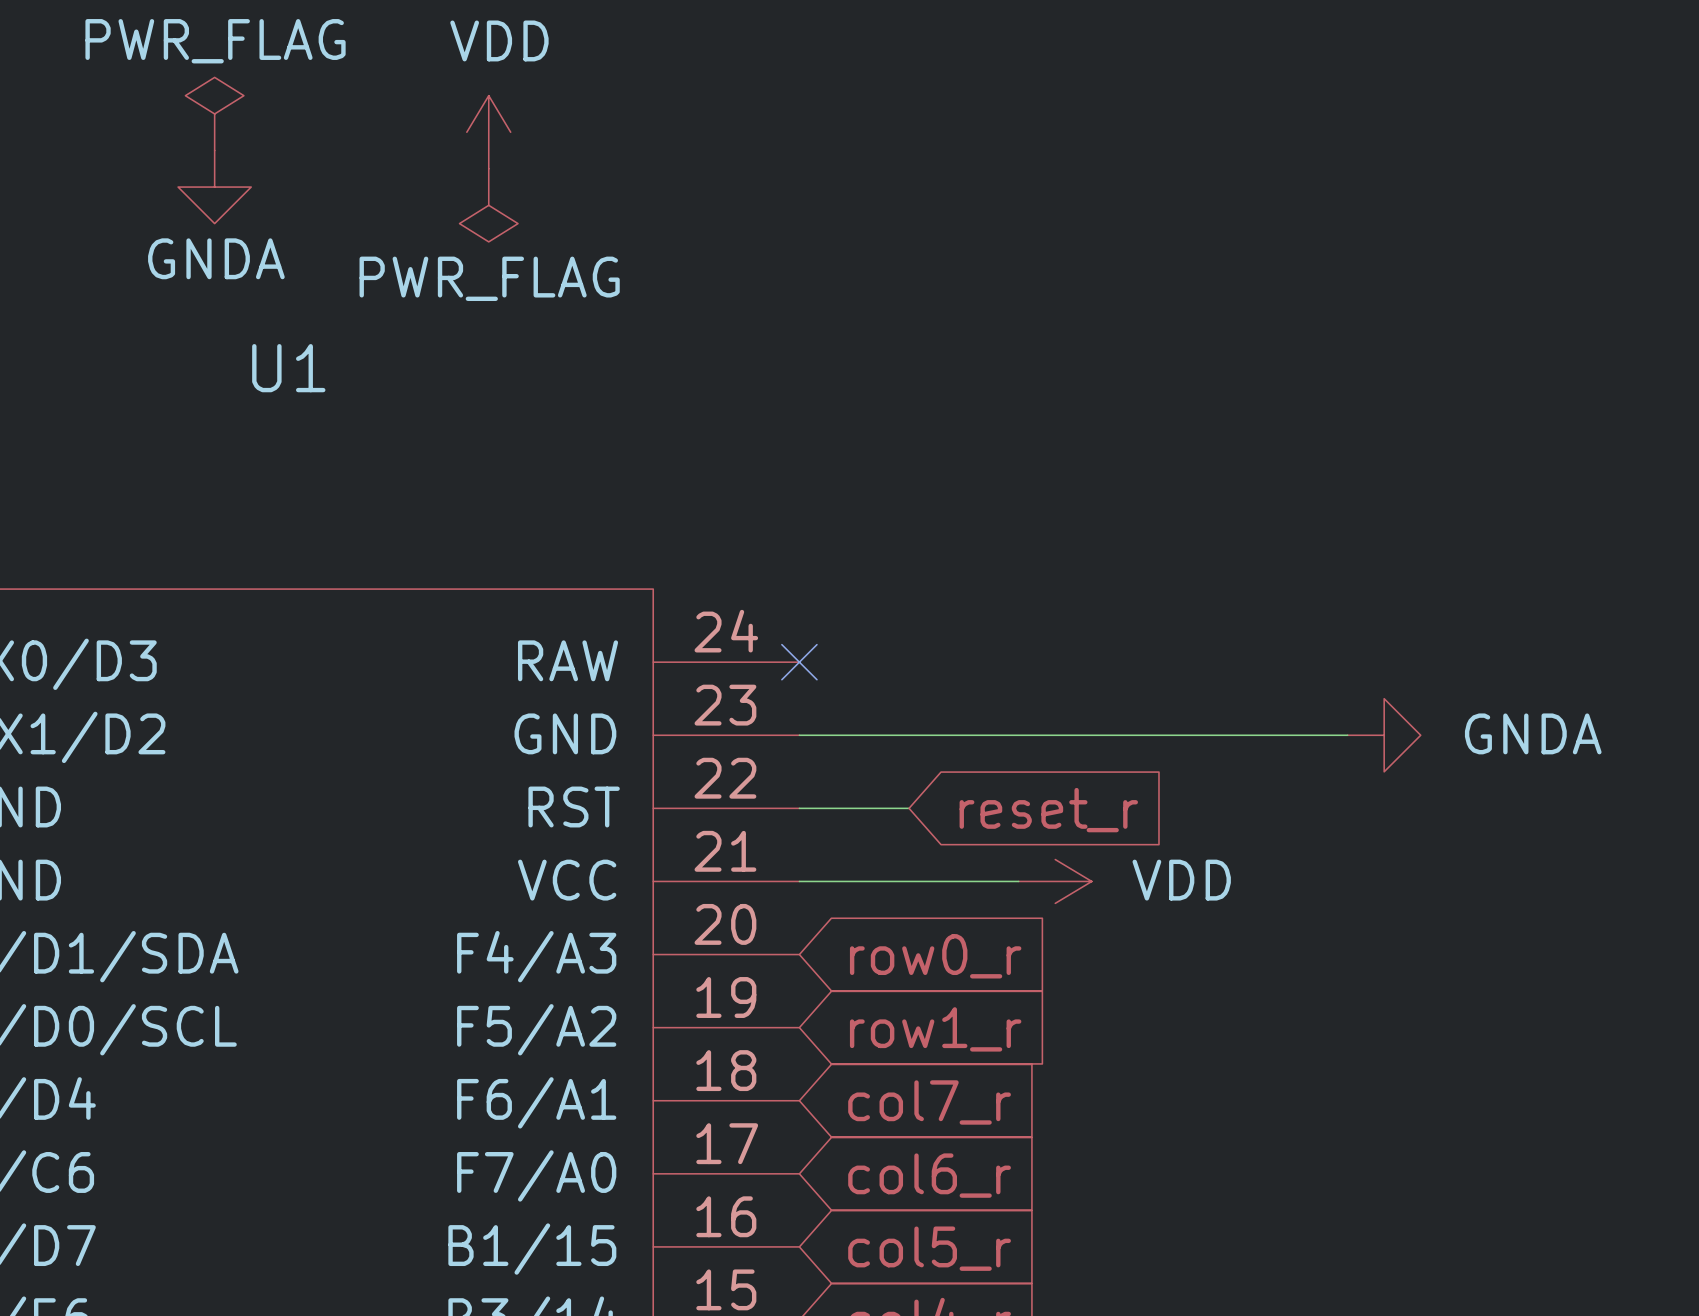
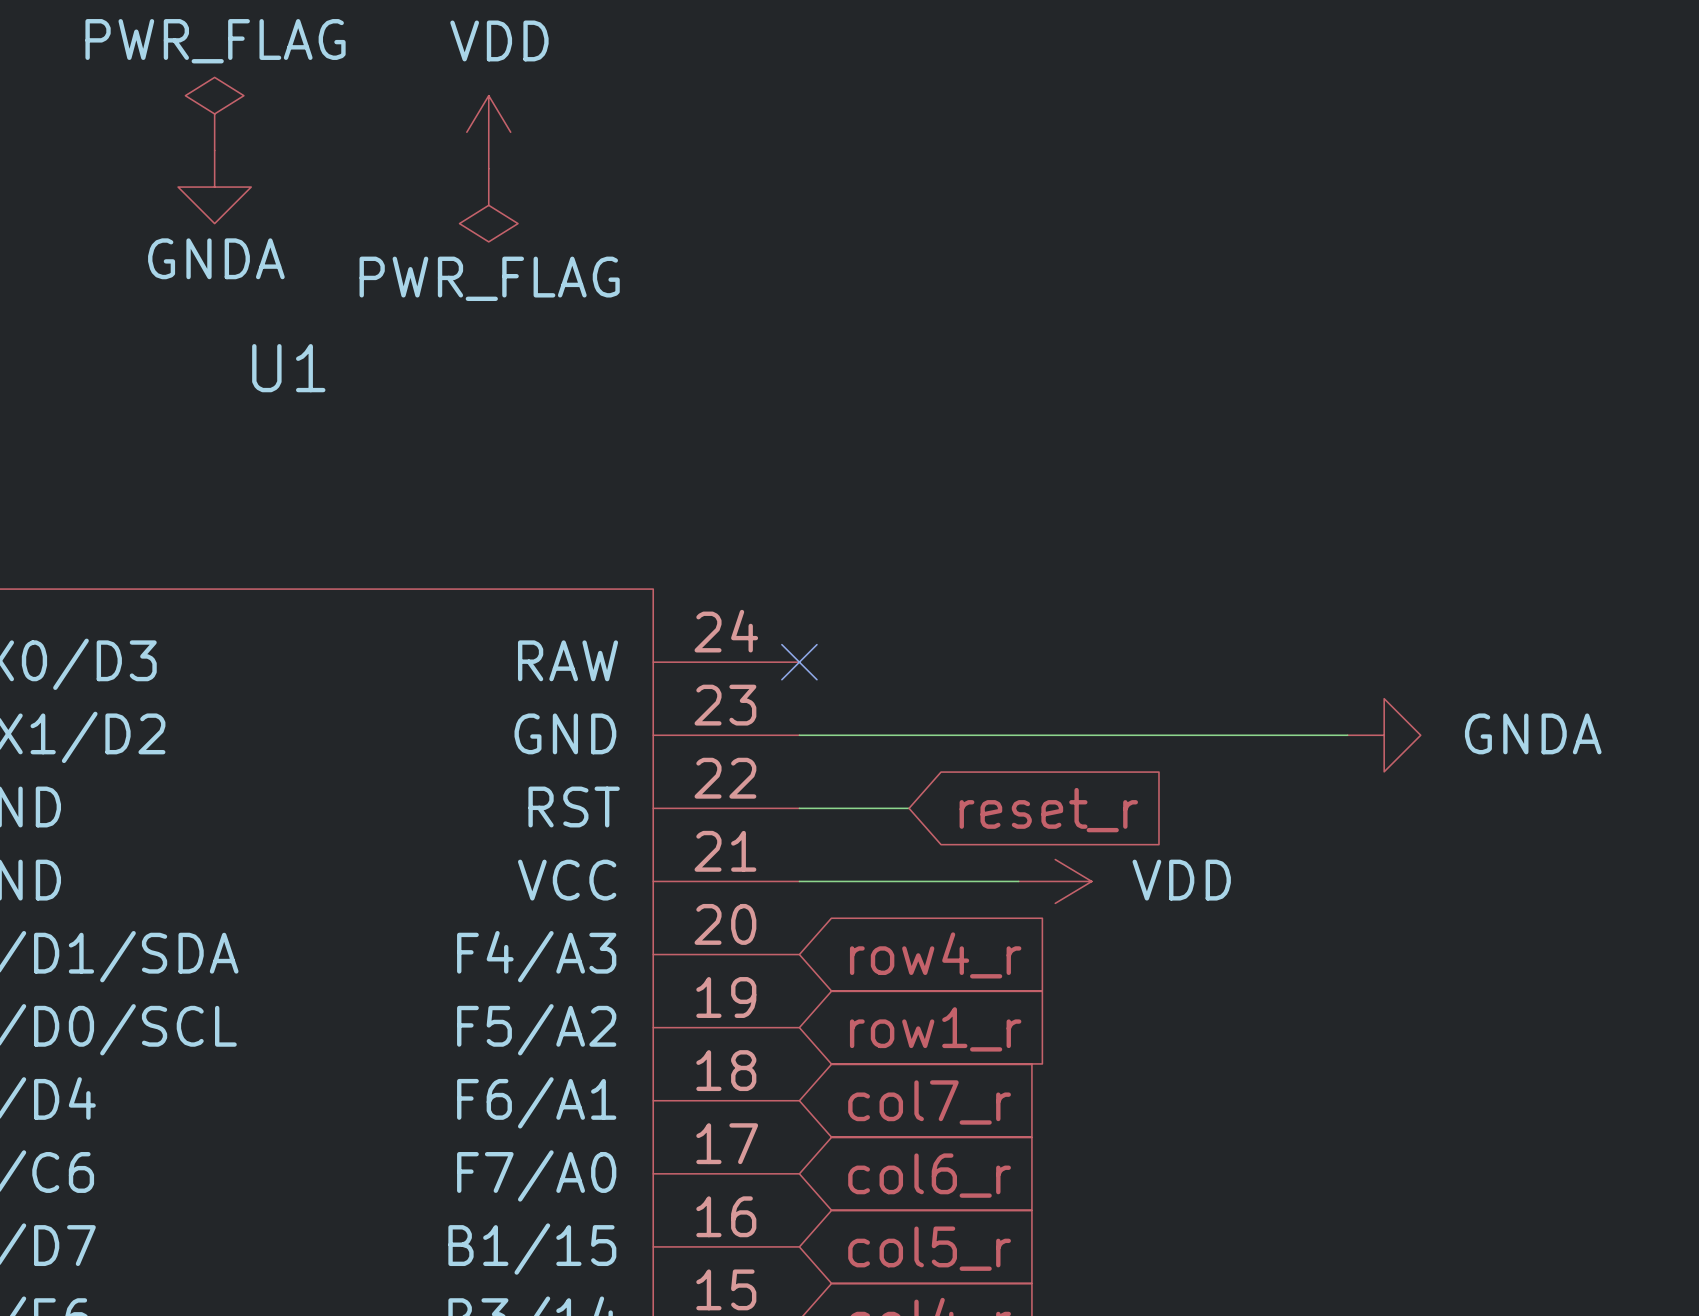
global label: row0_r (935, 956) -> row4_r (935, 955)

